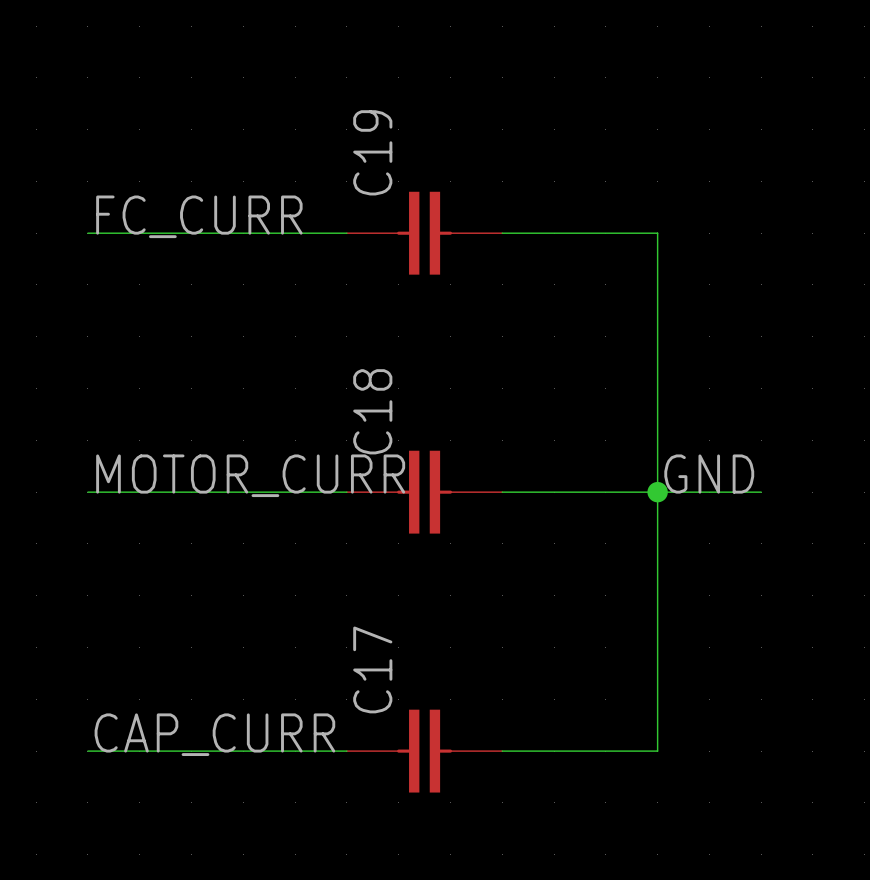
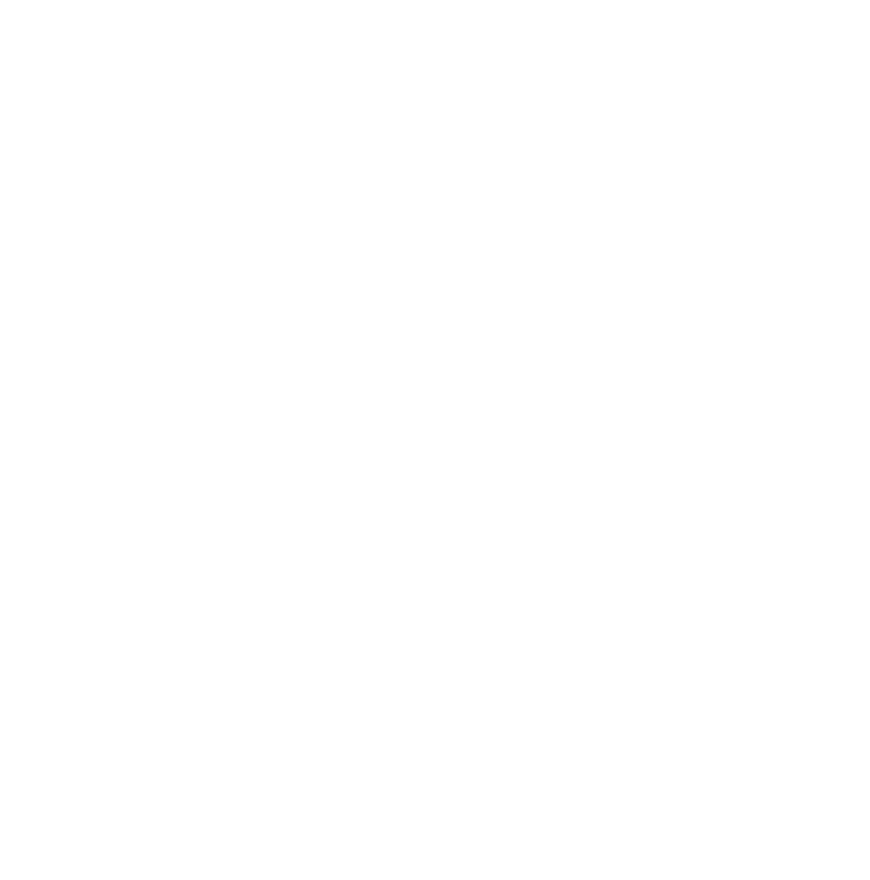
label: FC_CURR (199, 216) -> none
wire: (87, 233) (346, 233) -> none
C19: (424, 233) -> none
wire: (502, 233) (657, 233) (657, 751) (502, 751) -> none
label: GND (709, 474) -> none
label: MOTOR_CURR (250, 475) -> none
wire: (87, 492) (346, 492) -> none
C18: (424, 492) -> none
wire: (502, 492) (761, 492) -> none
junction: (657, 492) -> none
label: CAP_CURR (214, 734) -> none
wire: (87, 751) (346, 751) -> none
C17: (424, 751) -> none

